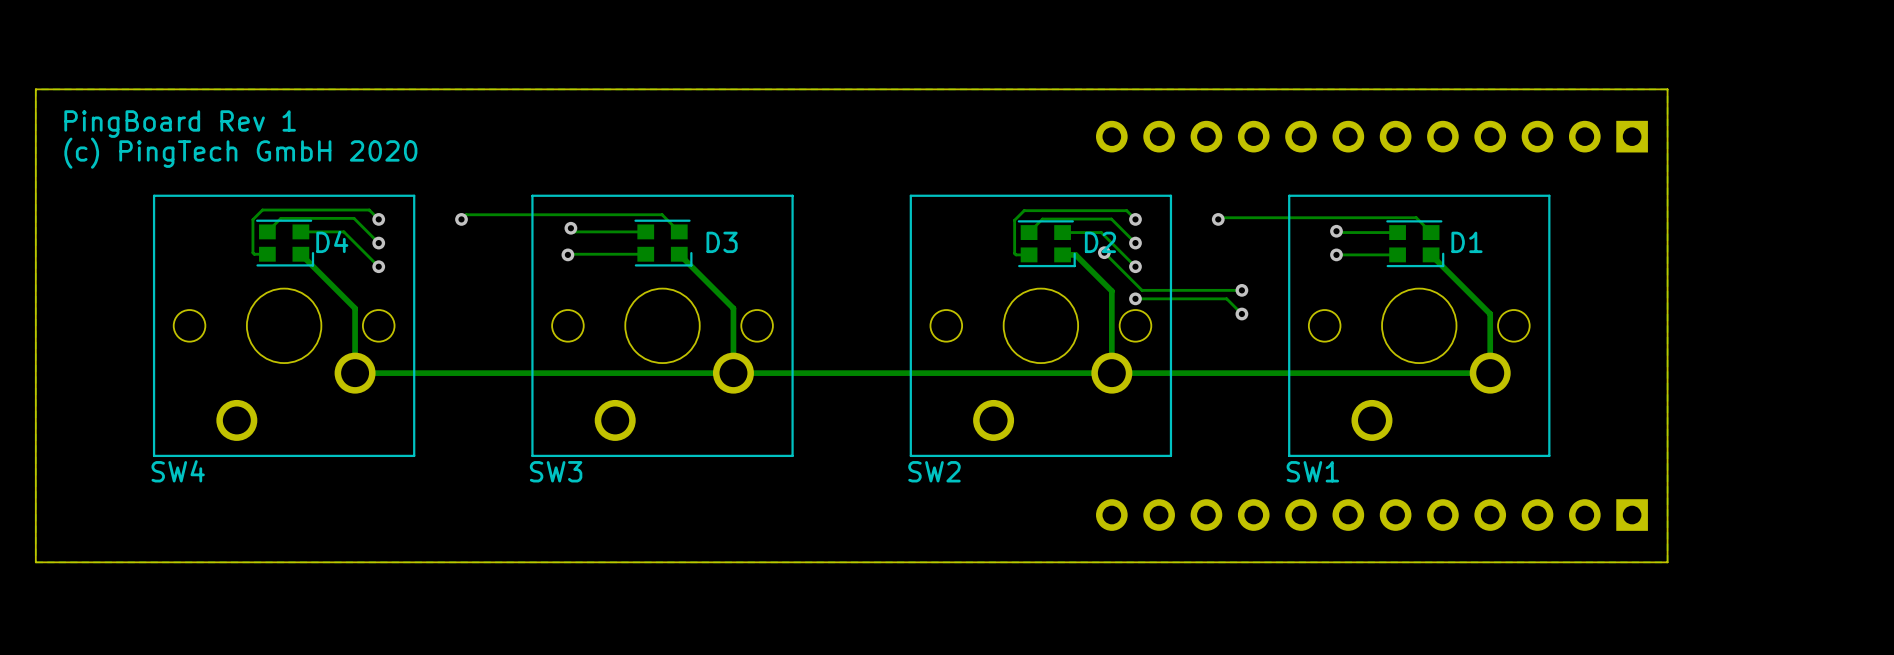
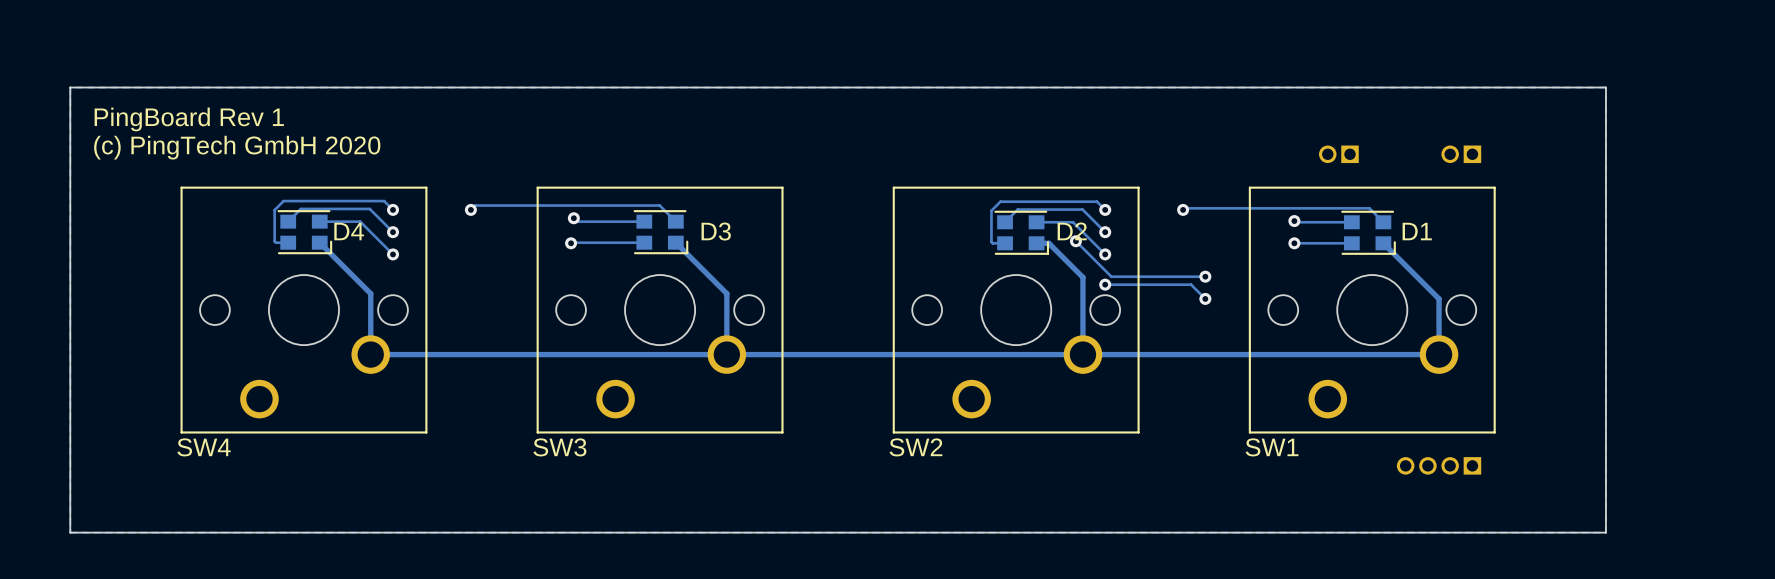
part: (1371, 136) -> none
part: none -> (1338, 154)
part: none -> (1461, 154)
part: none -> (1439, 465)
part: (1371, 515) -> none

